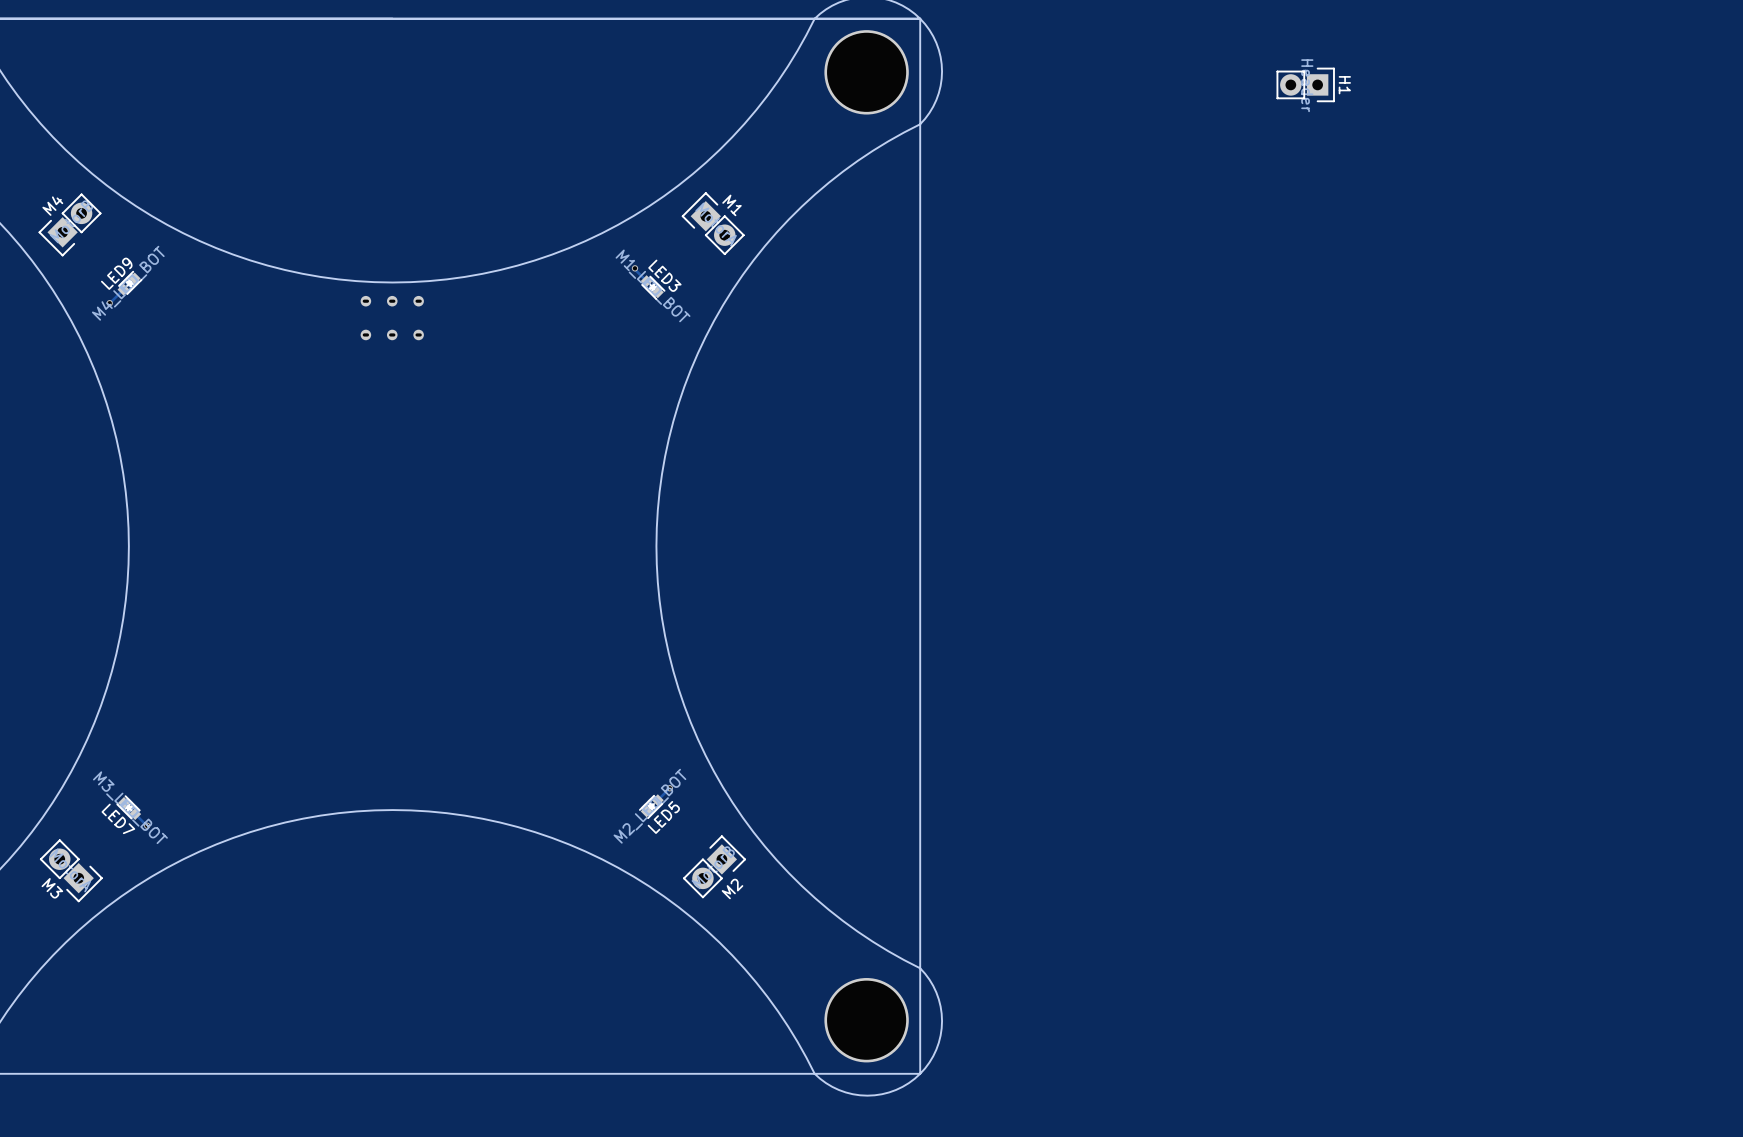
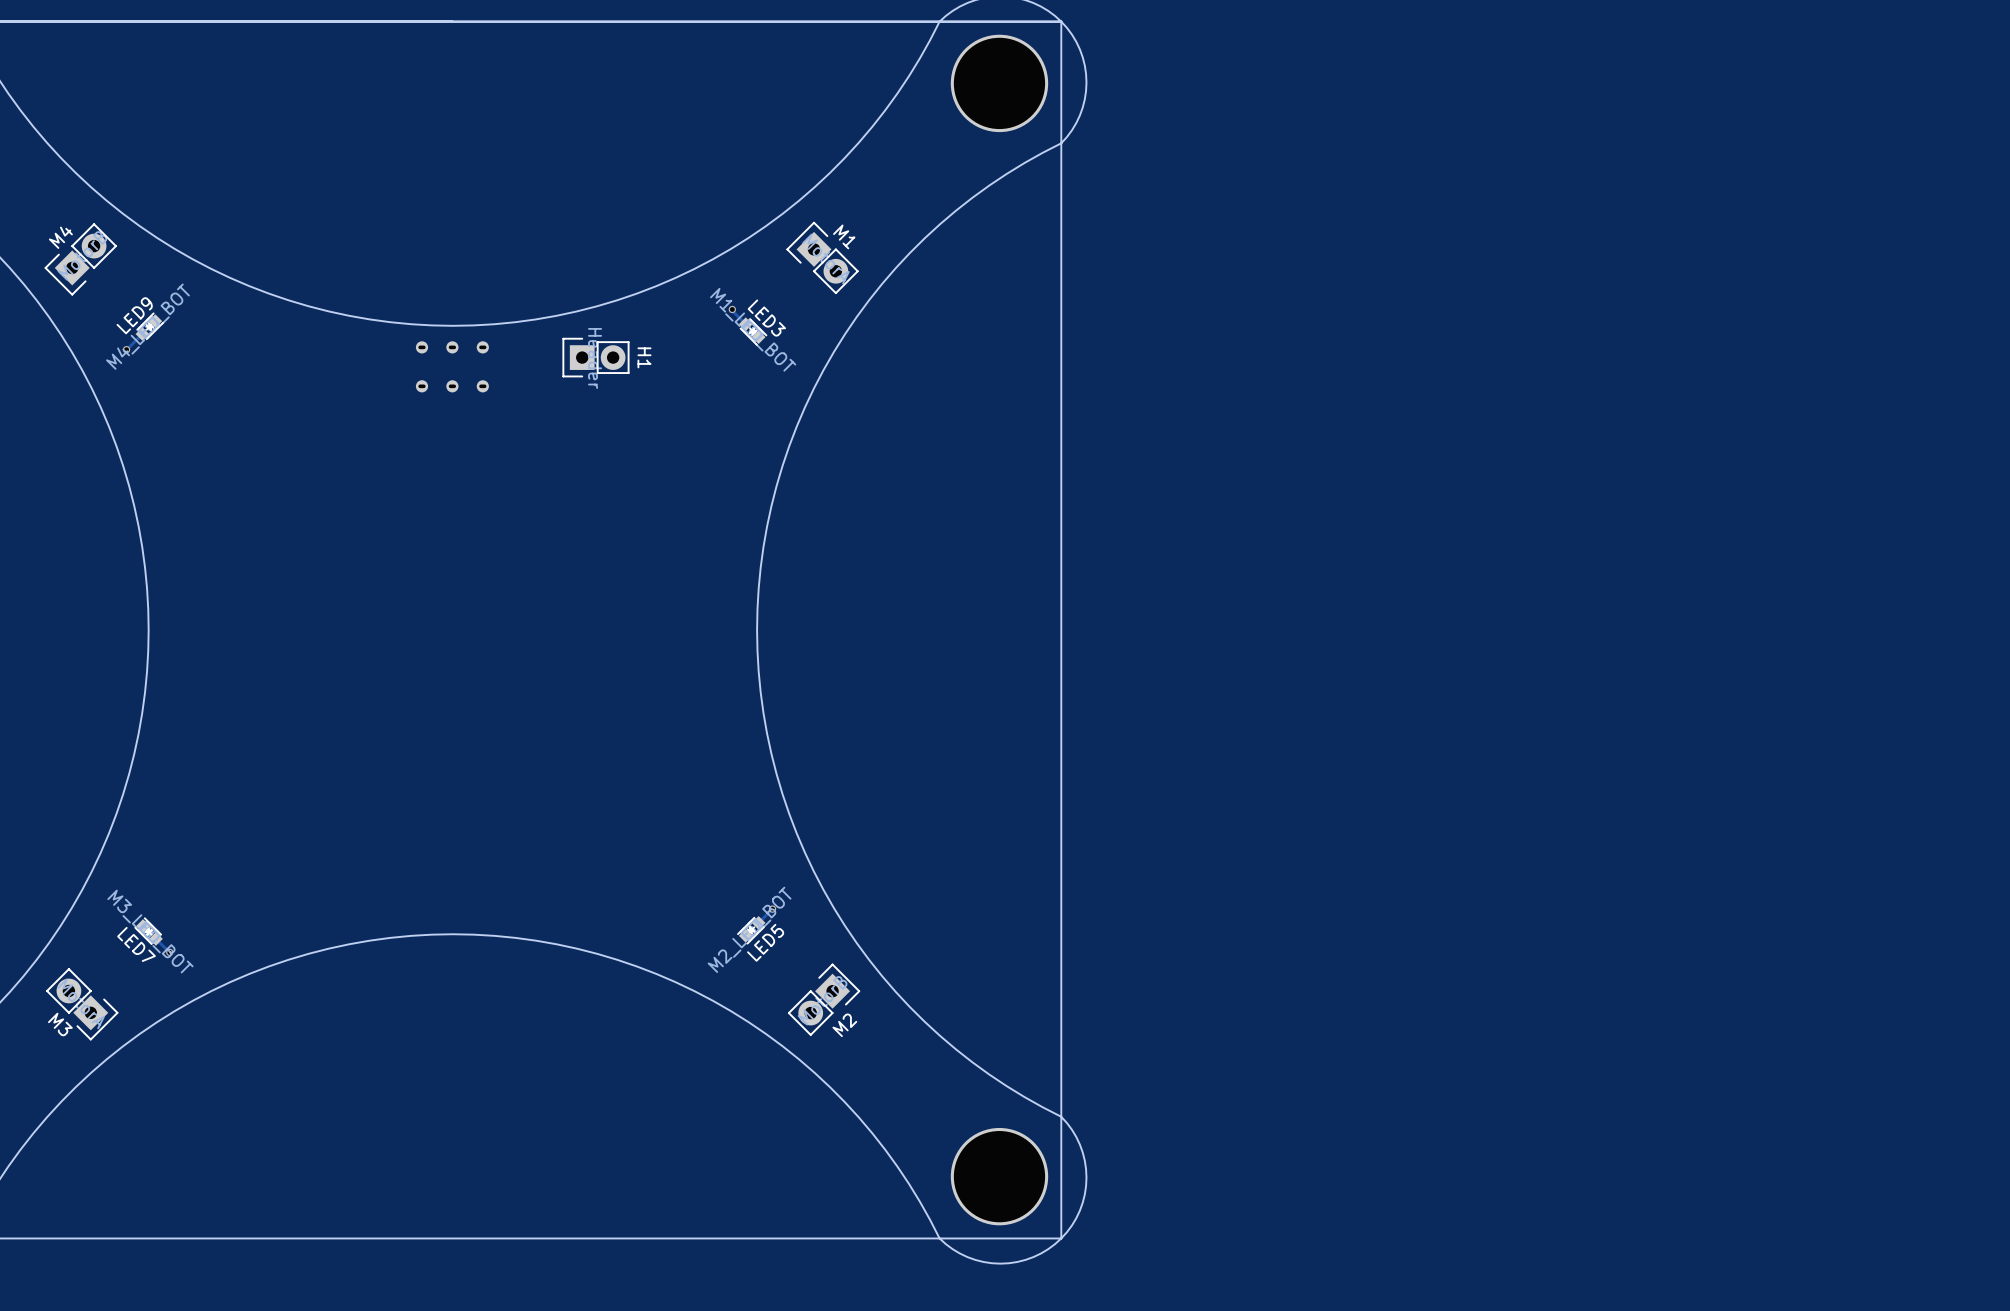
H1 rotation: 0° (1305, 84) -> 180° (595, 357)
H1 position: (1305, 84) -> (595, 357)

